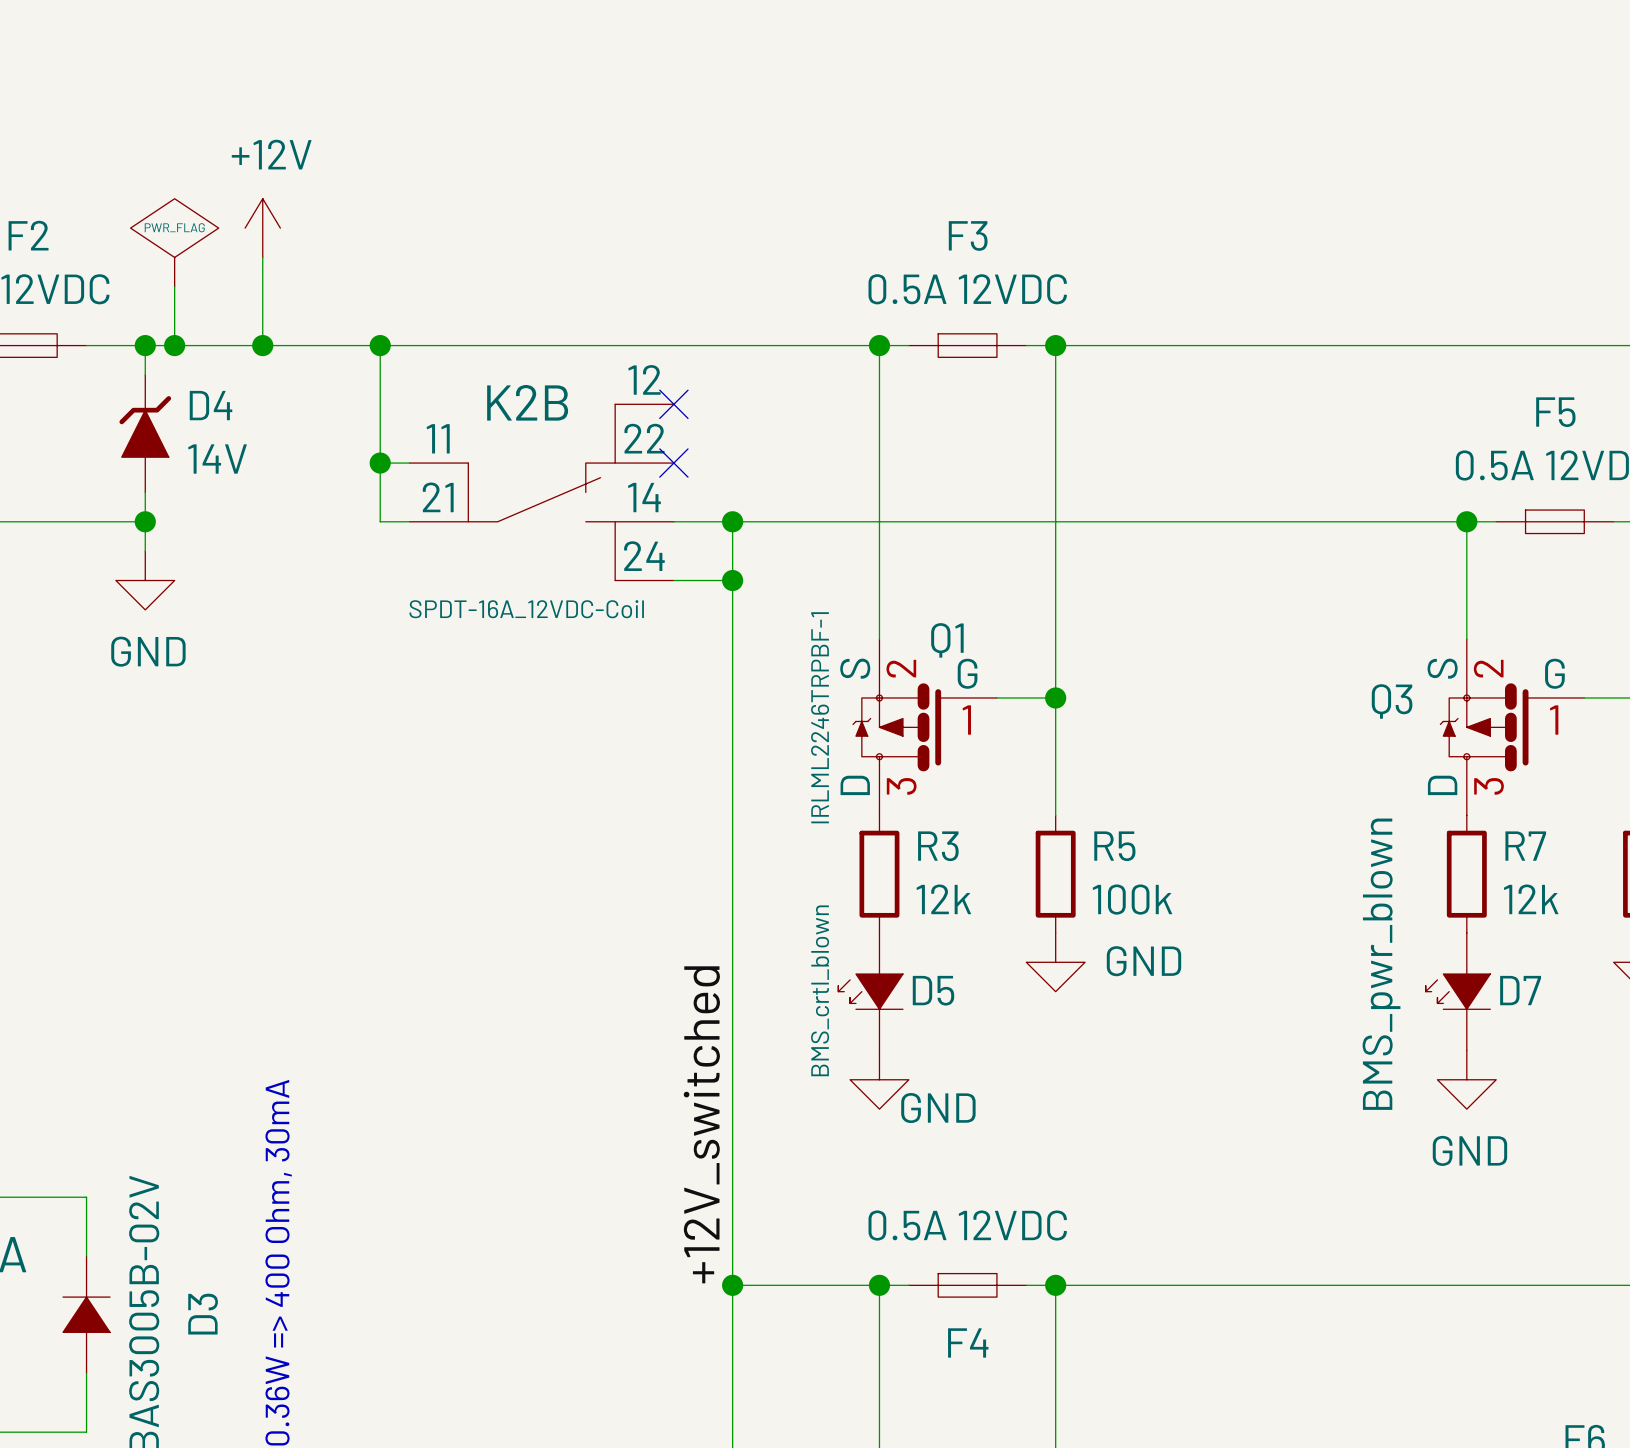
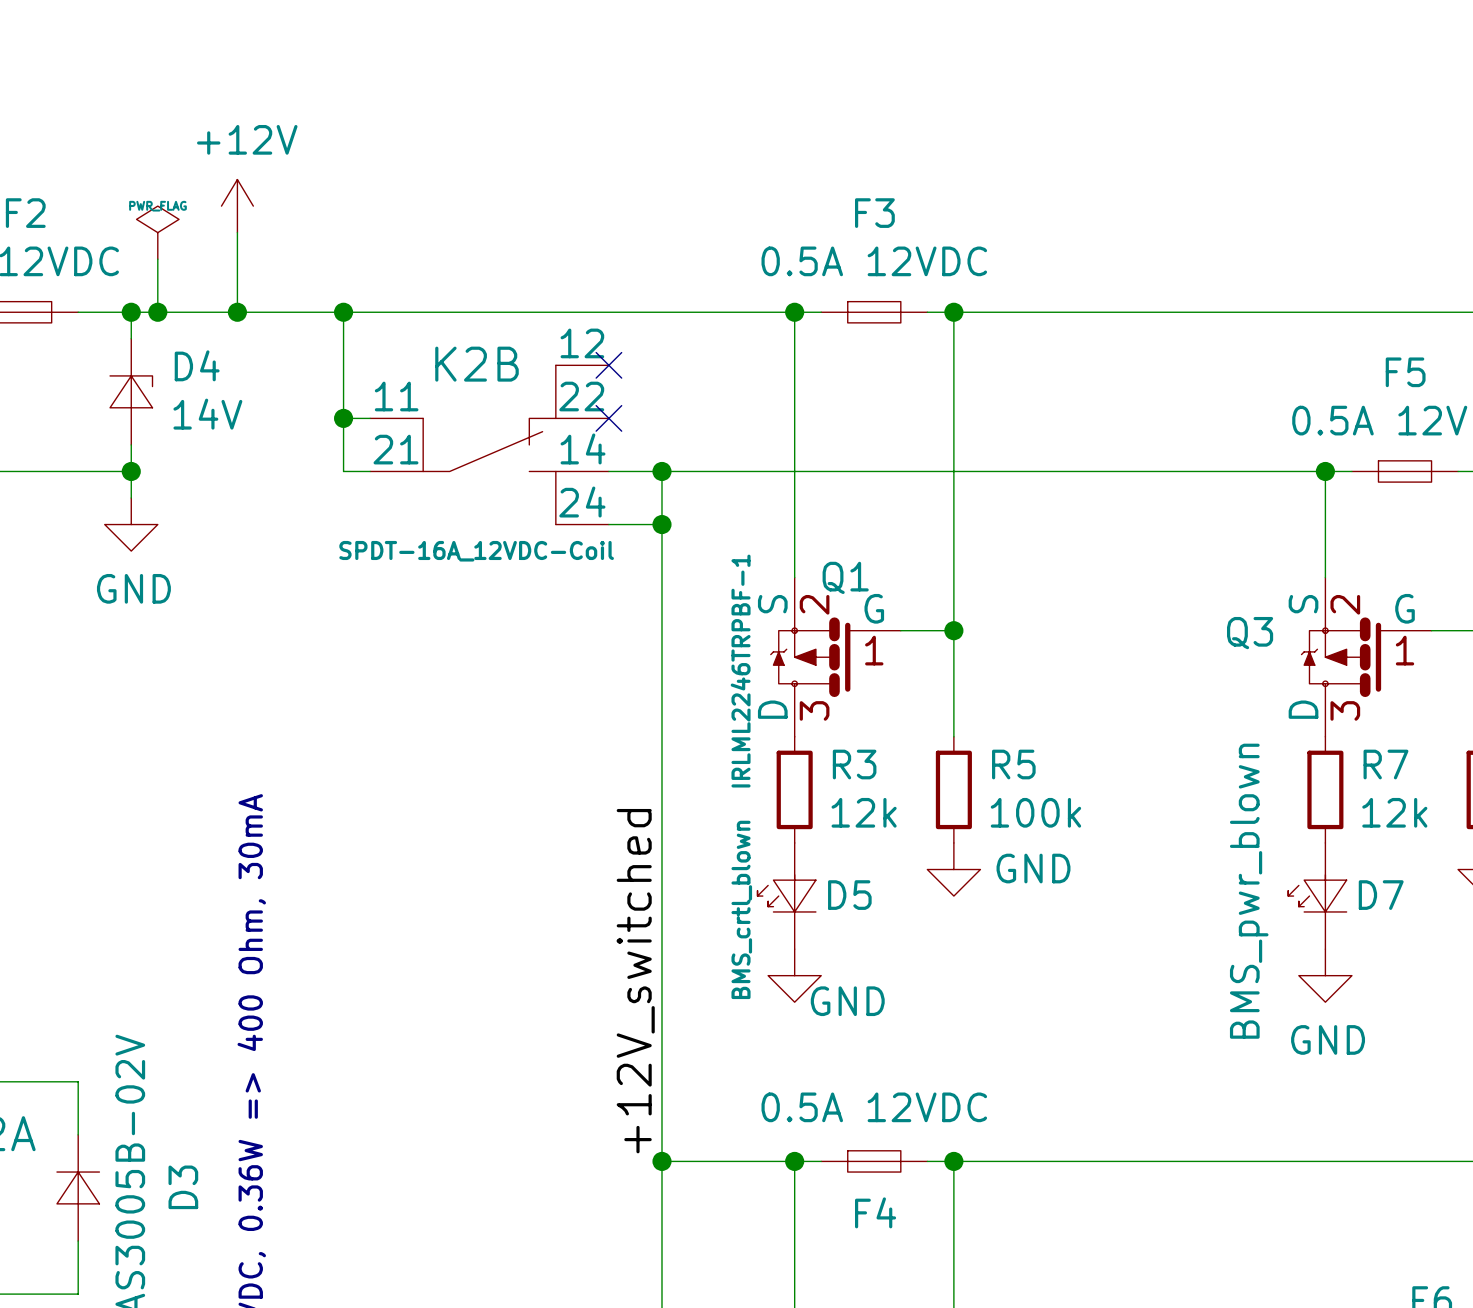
power symbol shape: [130, 198, 219, 287] -> [136, 206, 180, 260]
D4 symbol: [119, 374, 172, 493] -> [110, 338, 153, 445]
D5 symbol: [838, 932, 903, 1051] -> [757, 842, 816, 950]
D7 symbol: [1425, 932, 1491, 1051] -> [1288, 842, 1347, 950]
D3 symbol: [63, 1255, 111, 1374] -> [56, 1134, 100, 1242]

